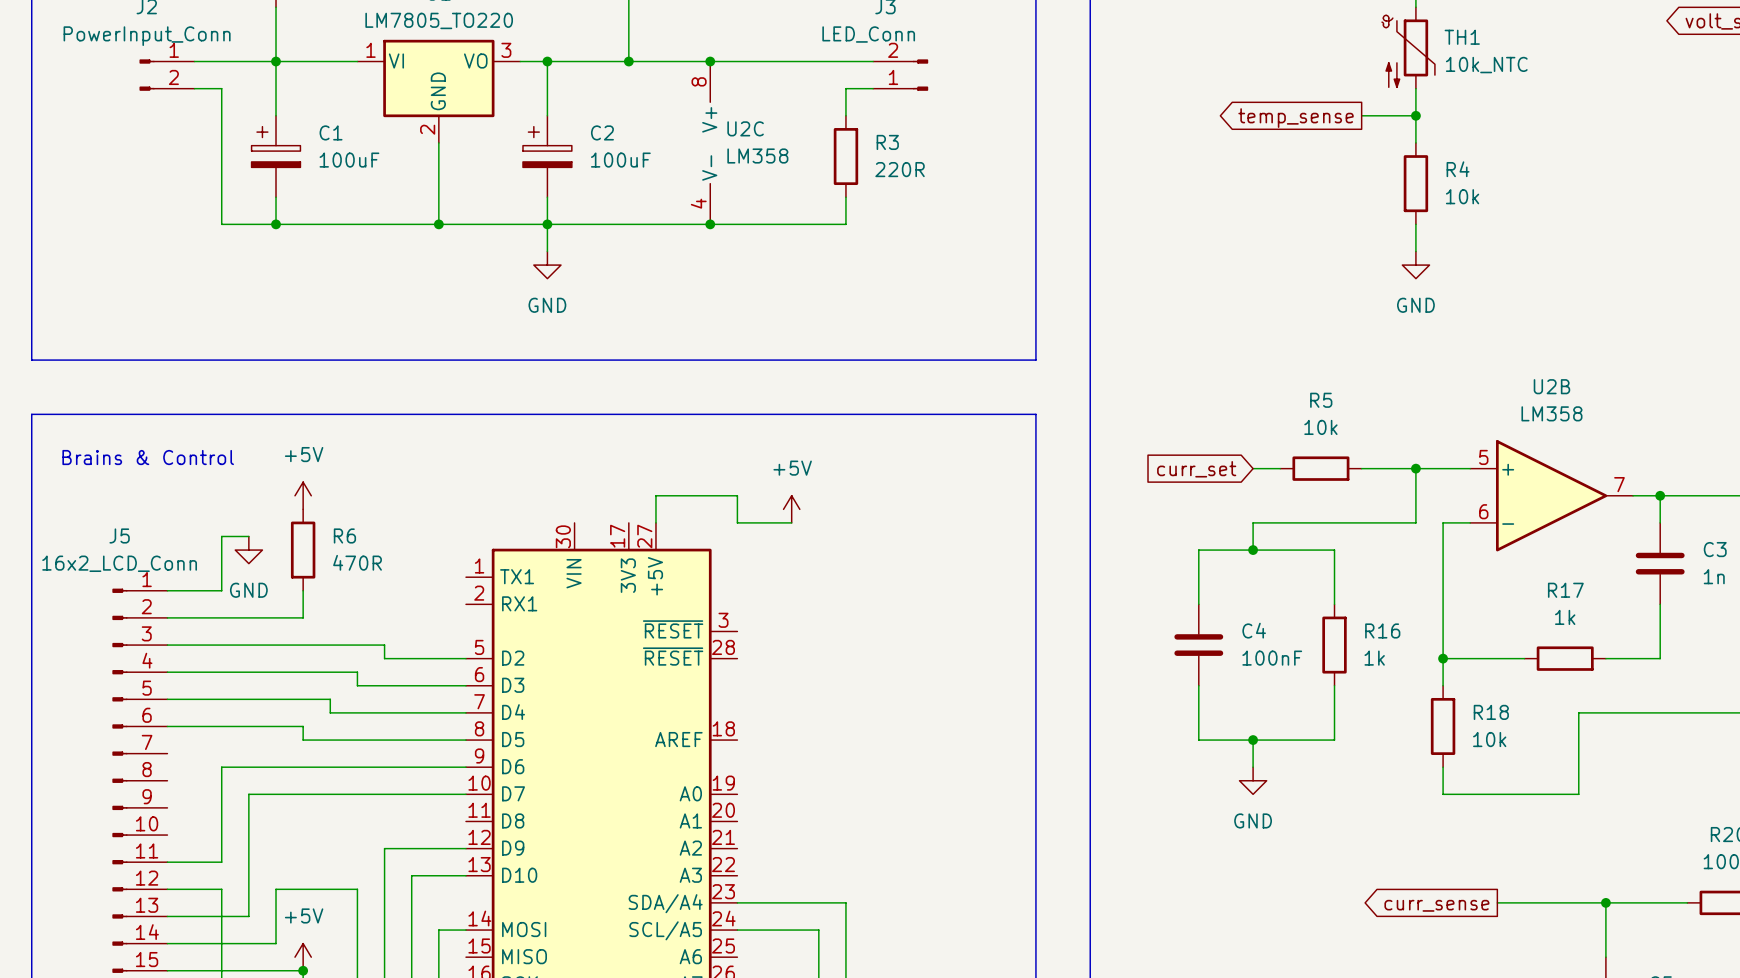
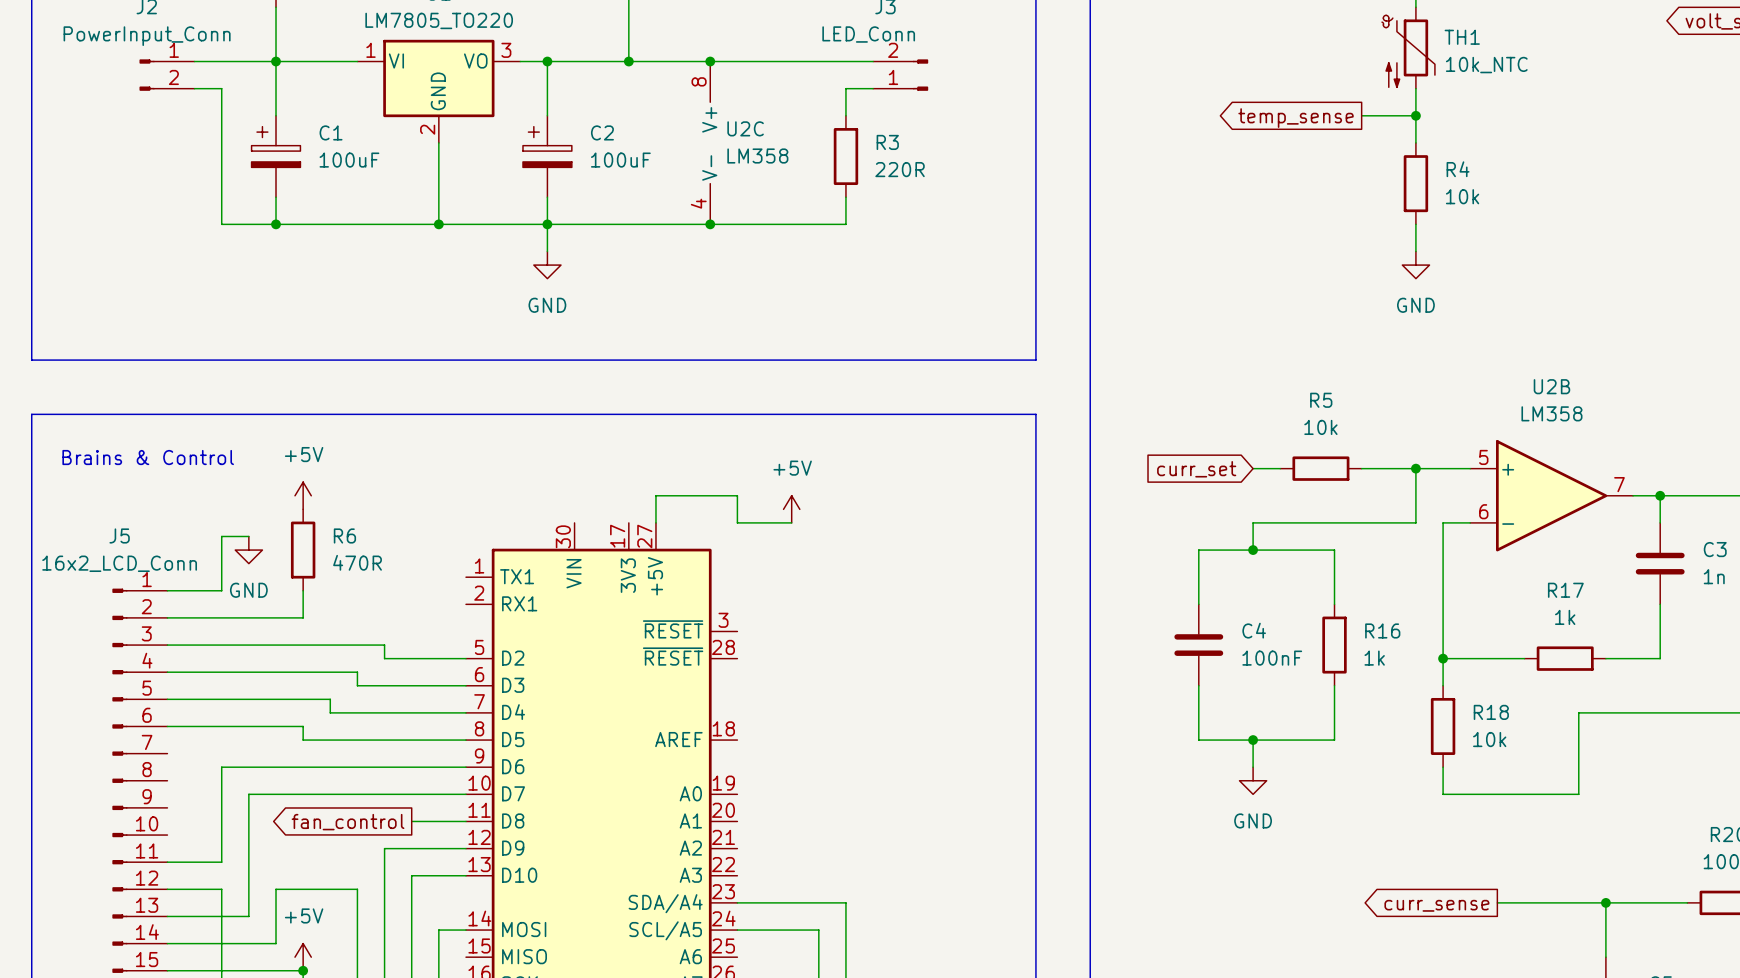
wire: none -> (411, 821) (465, 821)
global label: none -> fan_control (348, 822)

